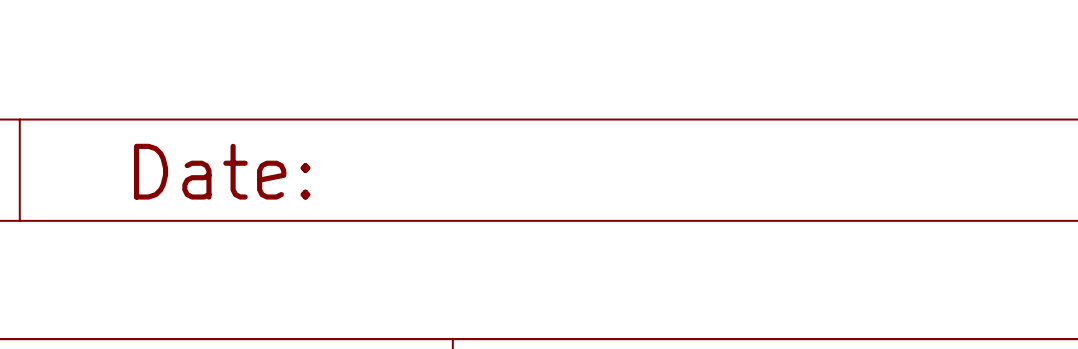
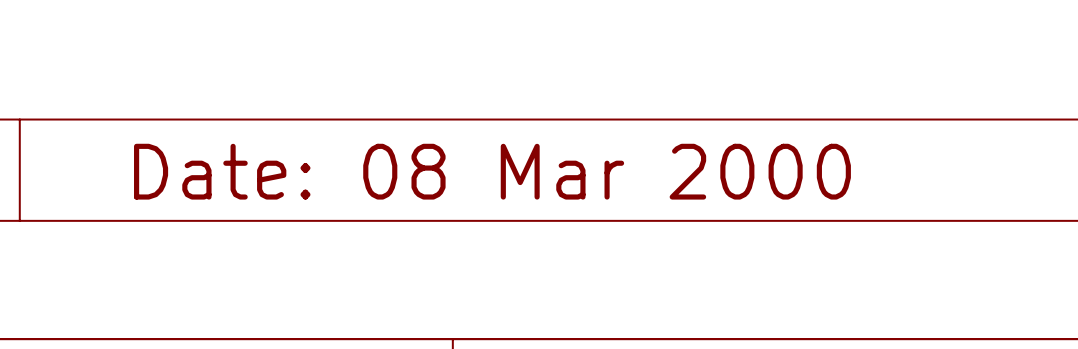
title block: Date: (222, 171) -> Date: 08 Mar 2000 (492, 171)

